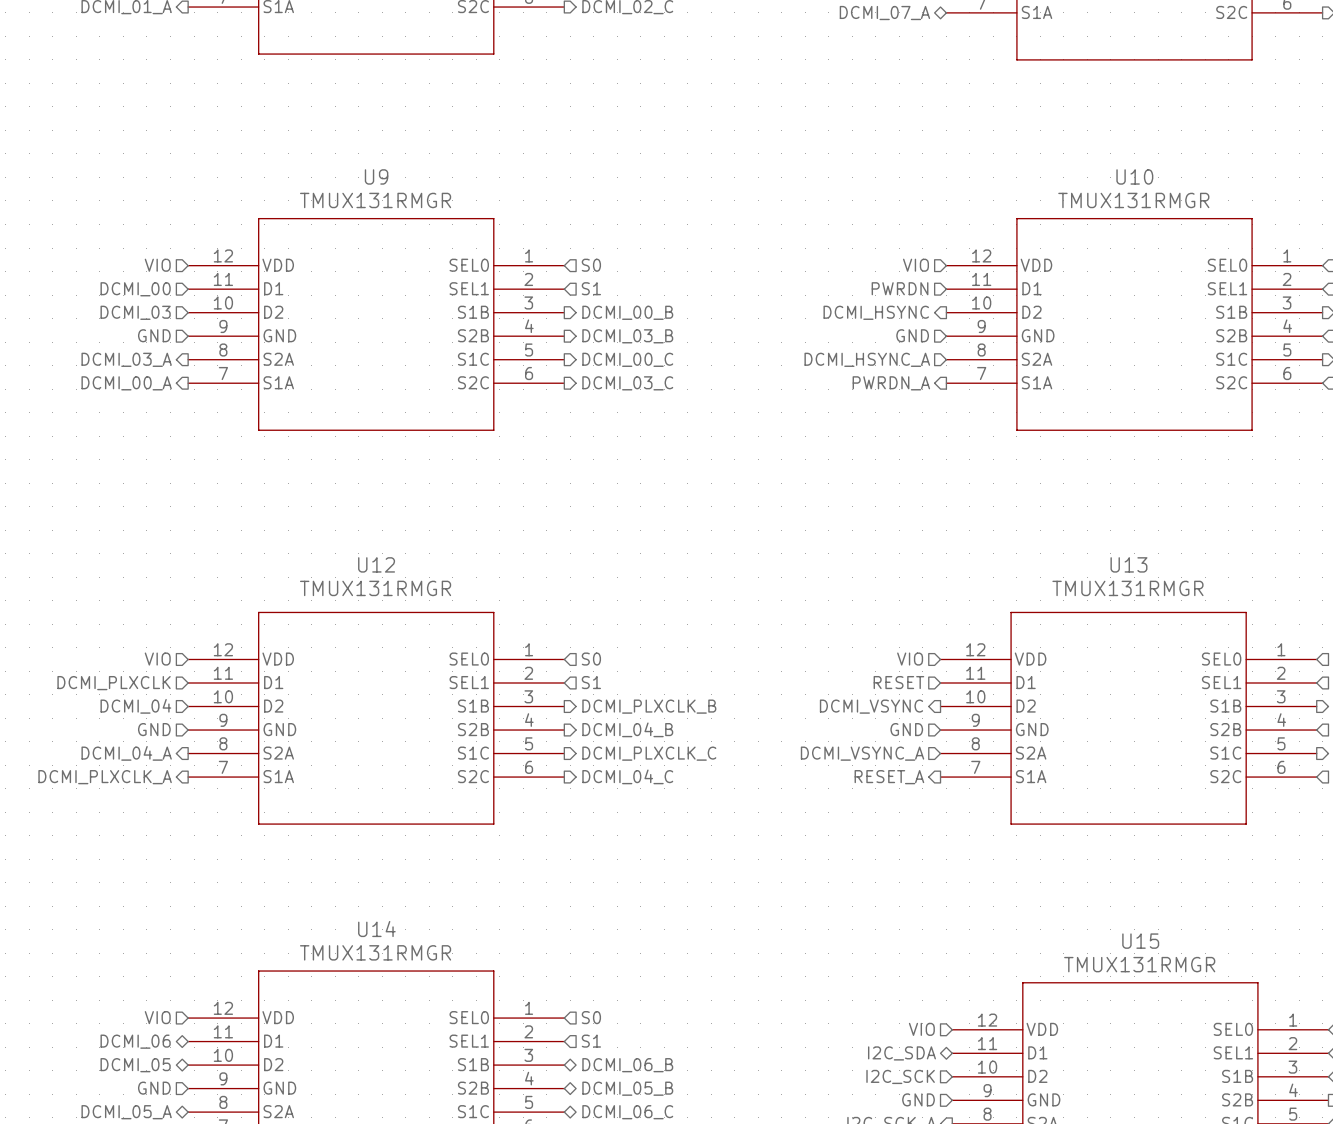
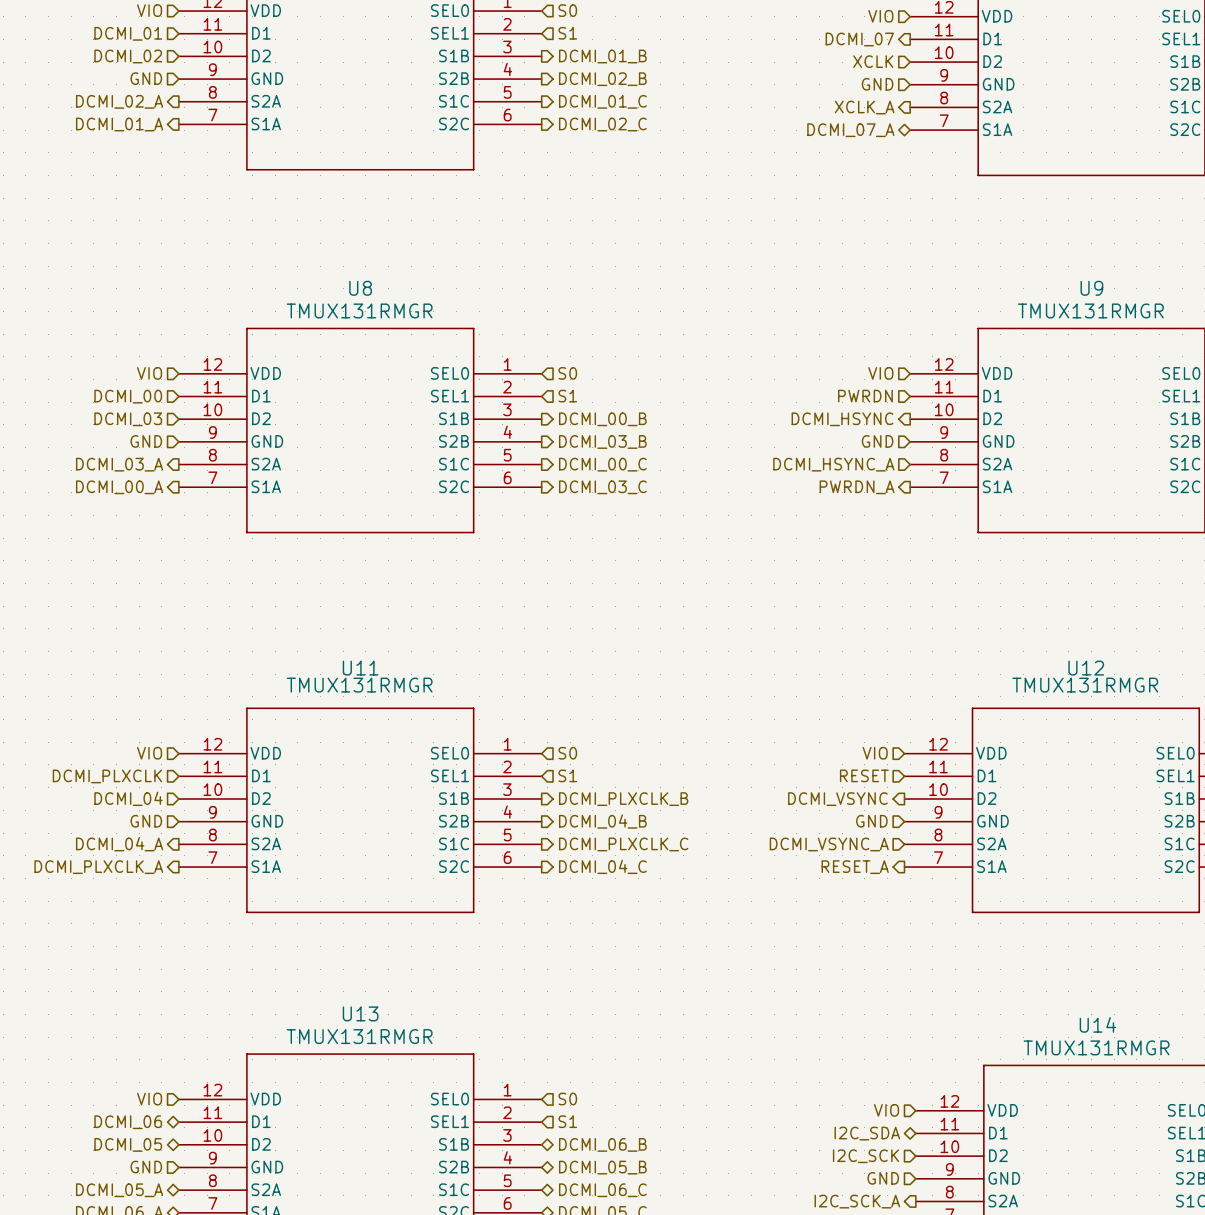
U9 name: U9 (376, 176) -> U8 (360, 288)
U10 name: U10 (1134, 176) -> U9 (1091, 288)
U12 name: U12 (376, 564) -> U11 (360, 668)
U13 name: U13 (1128, 564) -> U12 (1086, 668)
U14 name: U14 (376, 929) -> U13 (360, 1013)
U15 name: U15 (1140, 941) -> U14 (1097, 1024)

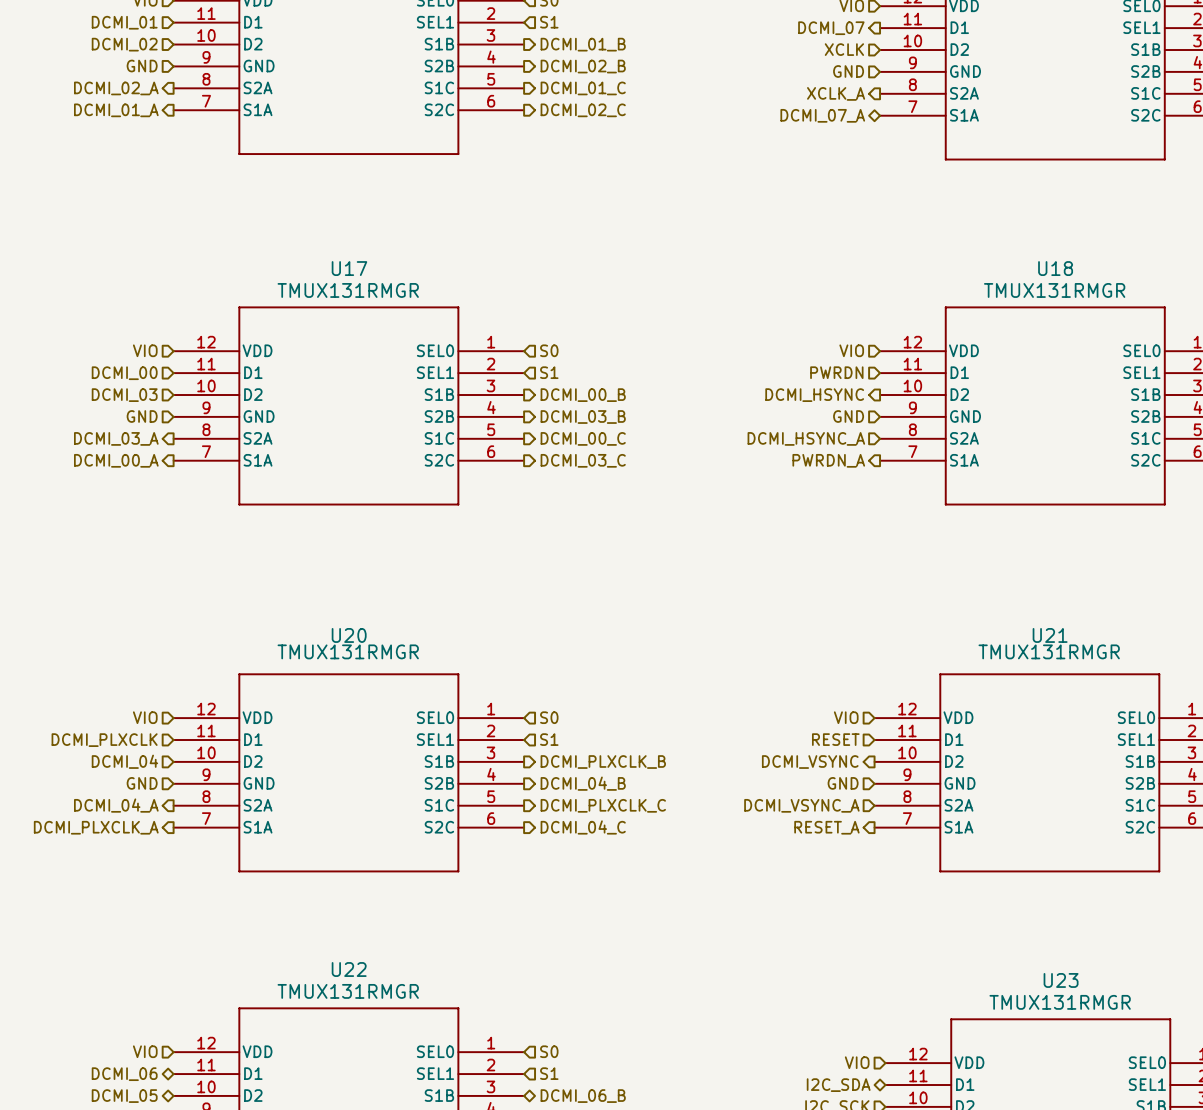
U8 name: U8 (360, 288) -> U17 (349, 268)
U9 name: U9 (1091, 288) -> U18 (1055, 268)
U11 name: U11 (360, 668) -> U20 (349, 635)
U12 name: U12 (1086, 668) -> U21 (1050, 635)
U13 name: U13 (360, 1013) -> U22 (349, 969)
U14 name: U14 (1097, 1024) -> U23 (1061, 980)

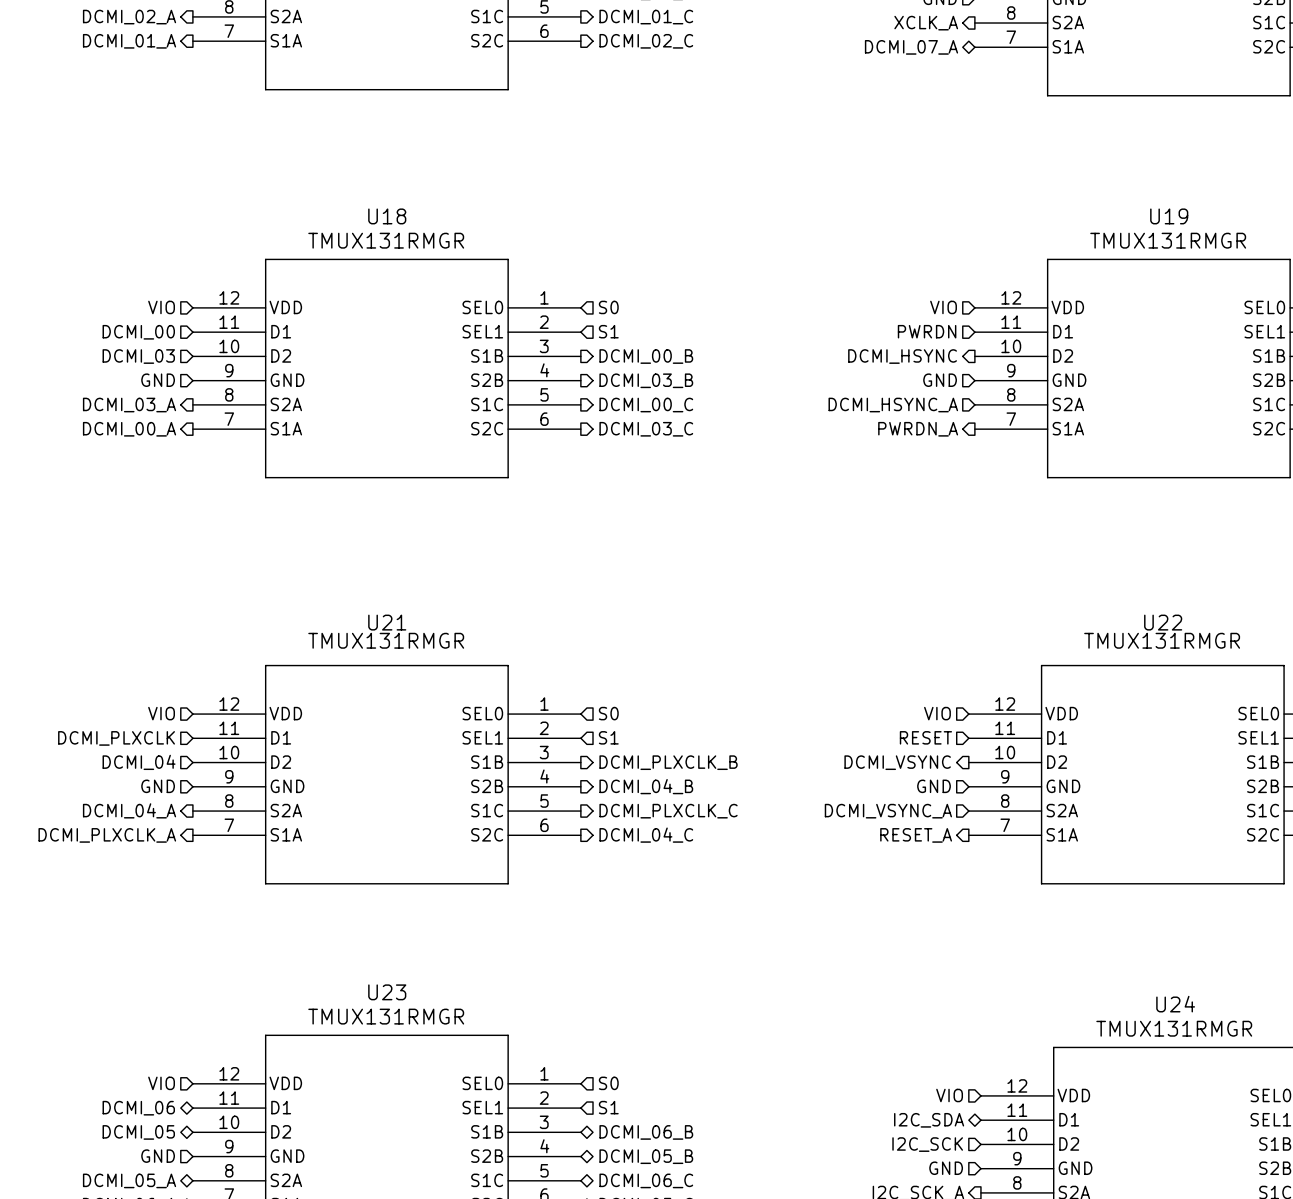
U17 name: U17 (349, 268) -> U18 (387, 216)
U18 name: U18 (1055, 268) -> U19 (1169, 216)
U20 name: U20 (349, 635) -> U21 (387, 622)
U21 name: U21 (1050, 635) -> U22 (1163, 622)
U22 name: U22 (349, 969) -> U23 (387, 992)
U23 name: U23 (1061, 980) -> U24 (1175, 1004)

